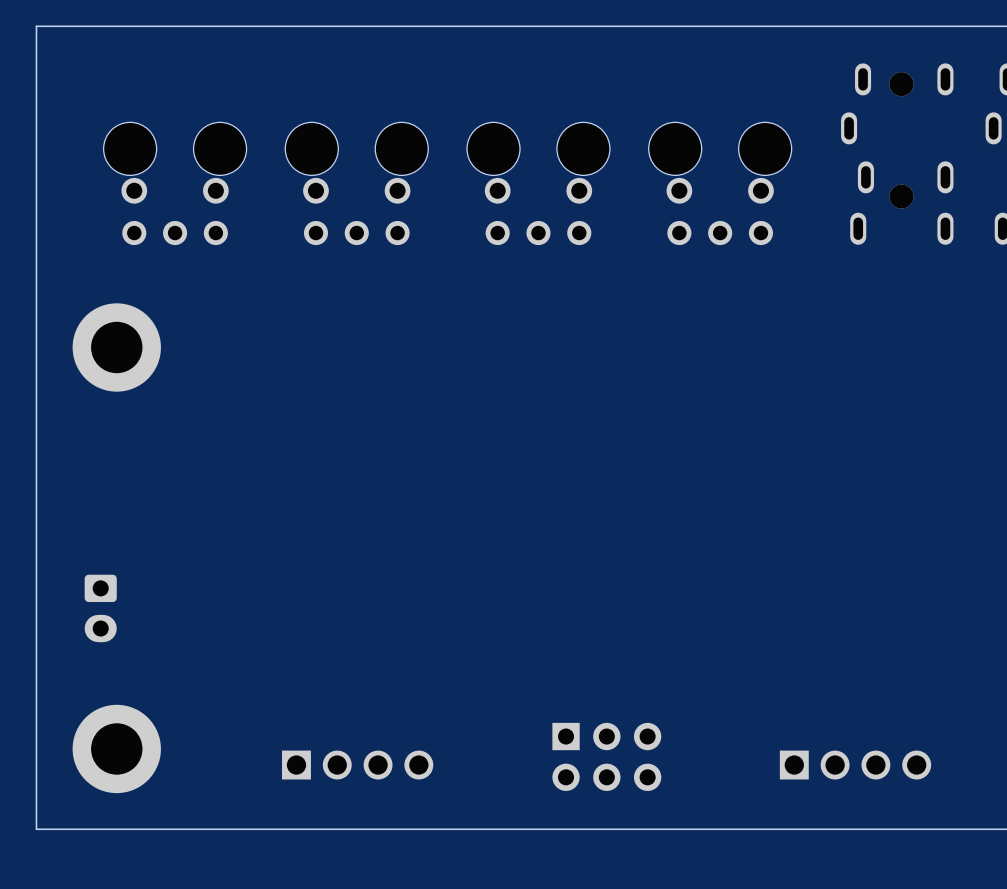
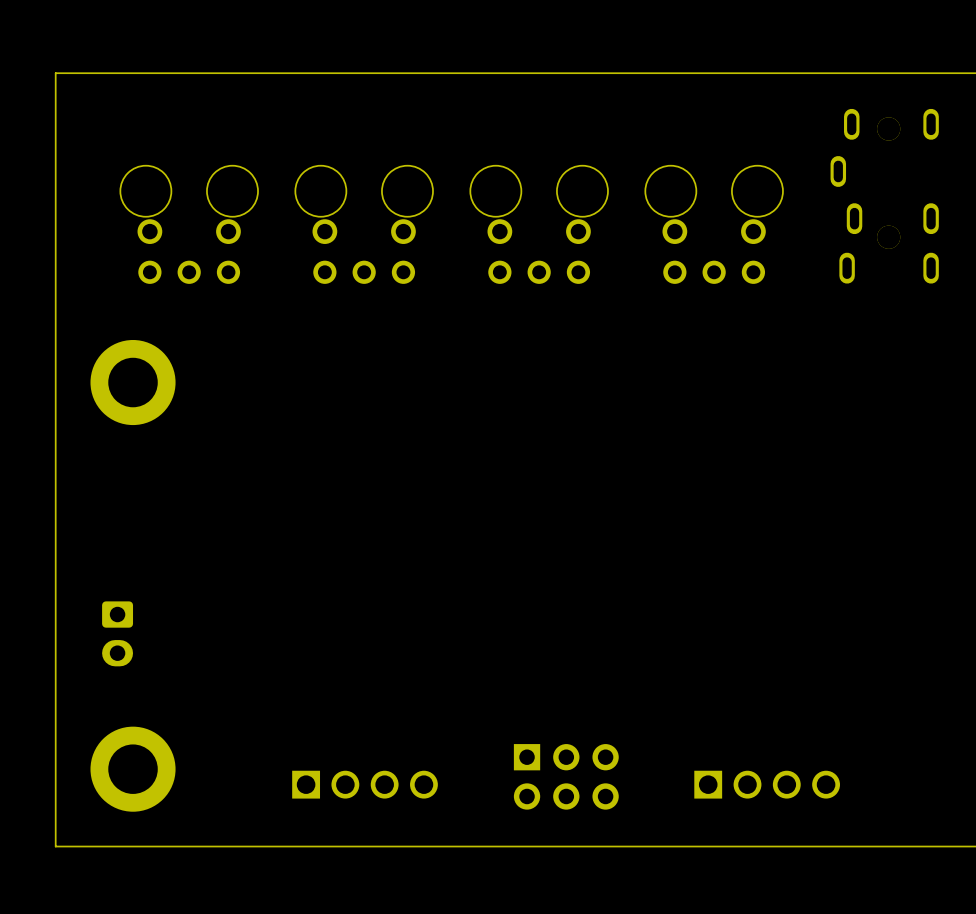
part position: (606, 756) -> (566, 776)
part position: (855, 765) -> (767, 784)

